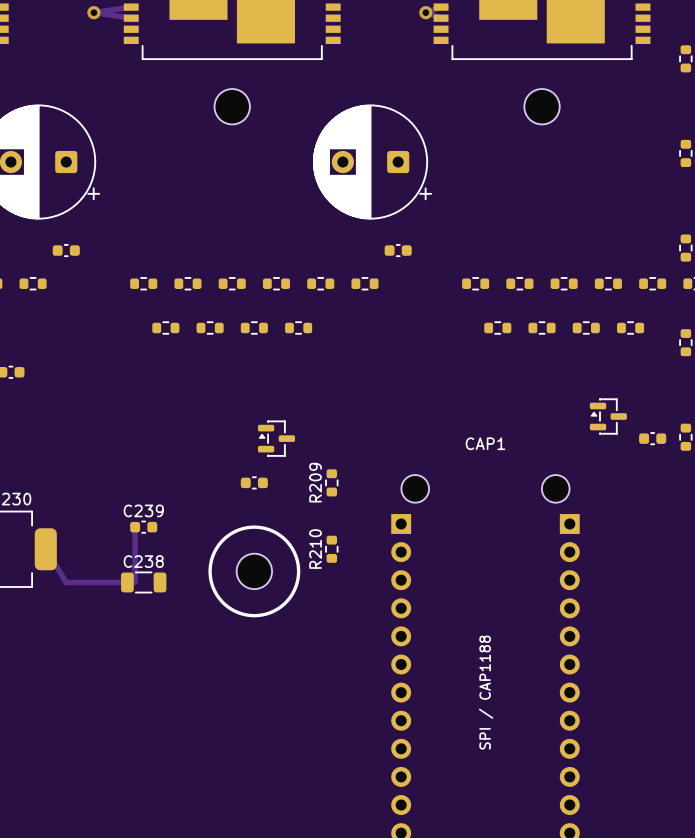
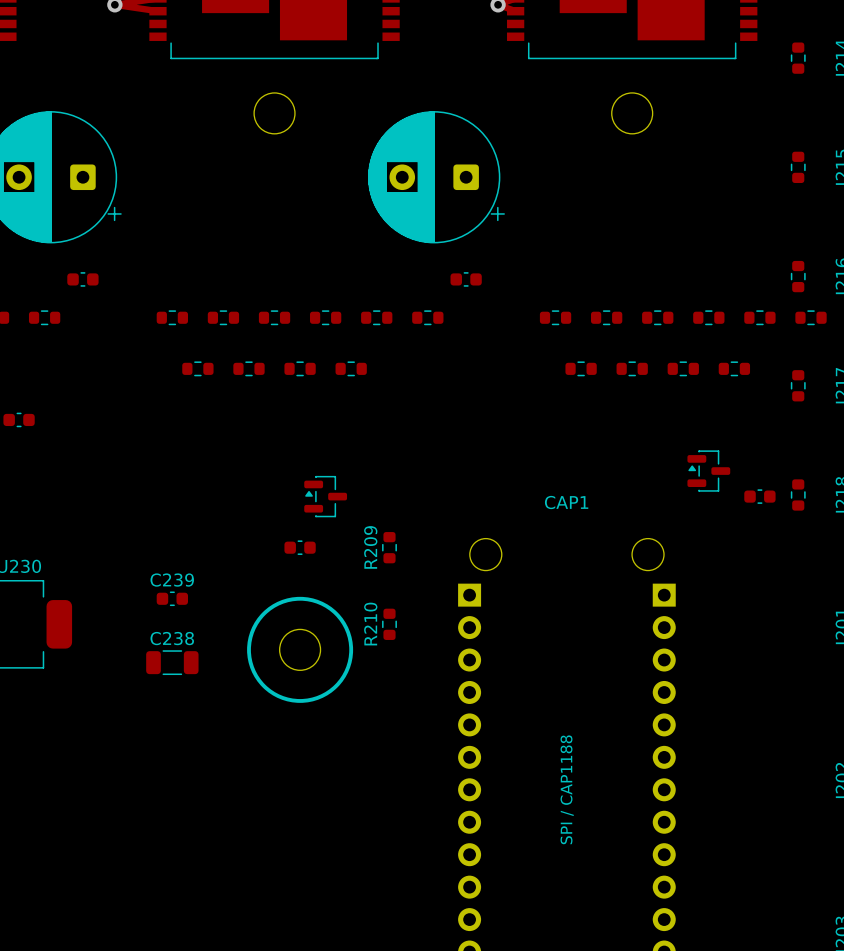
track: (135, 527) (135, 582) -> none
track: (45, 549) (66, 582) (127, 582) -> none

